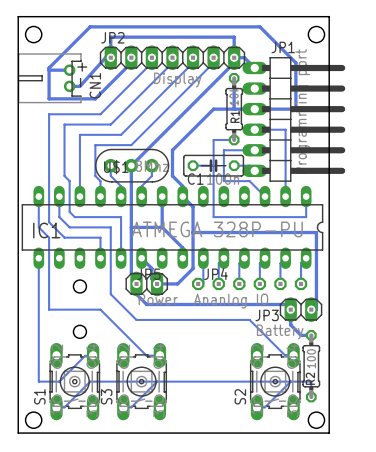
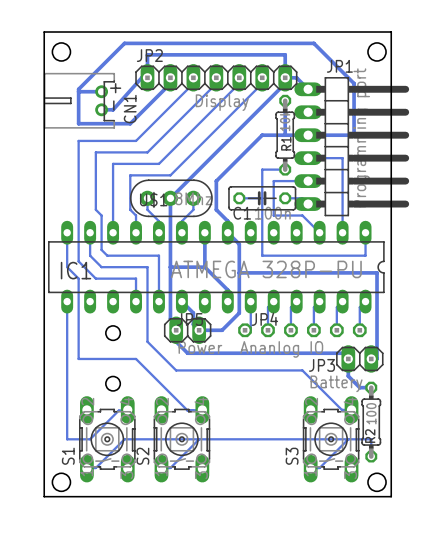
S3 name: S3 (106, 396) -> S2 (142, 456)
S2 name: S2 (240, 396) -> S3 (292, 456)

